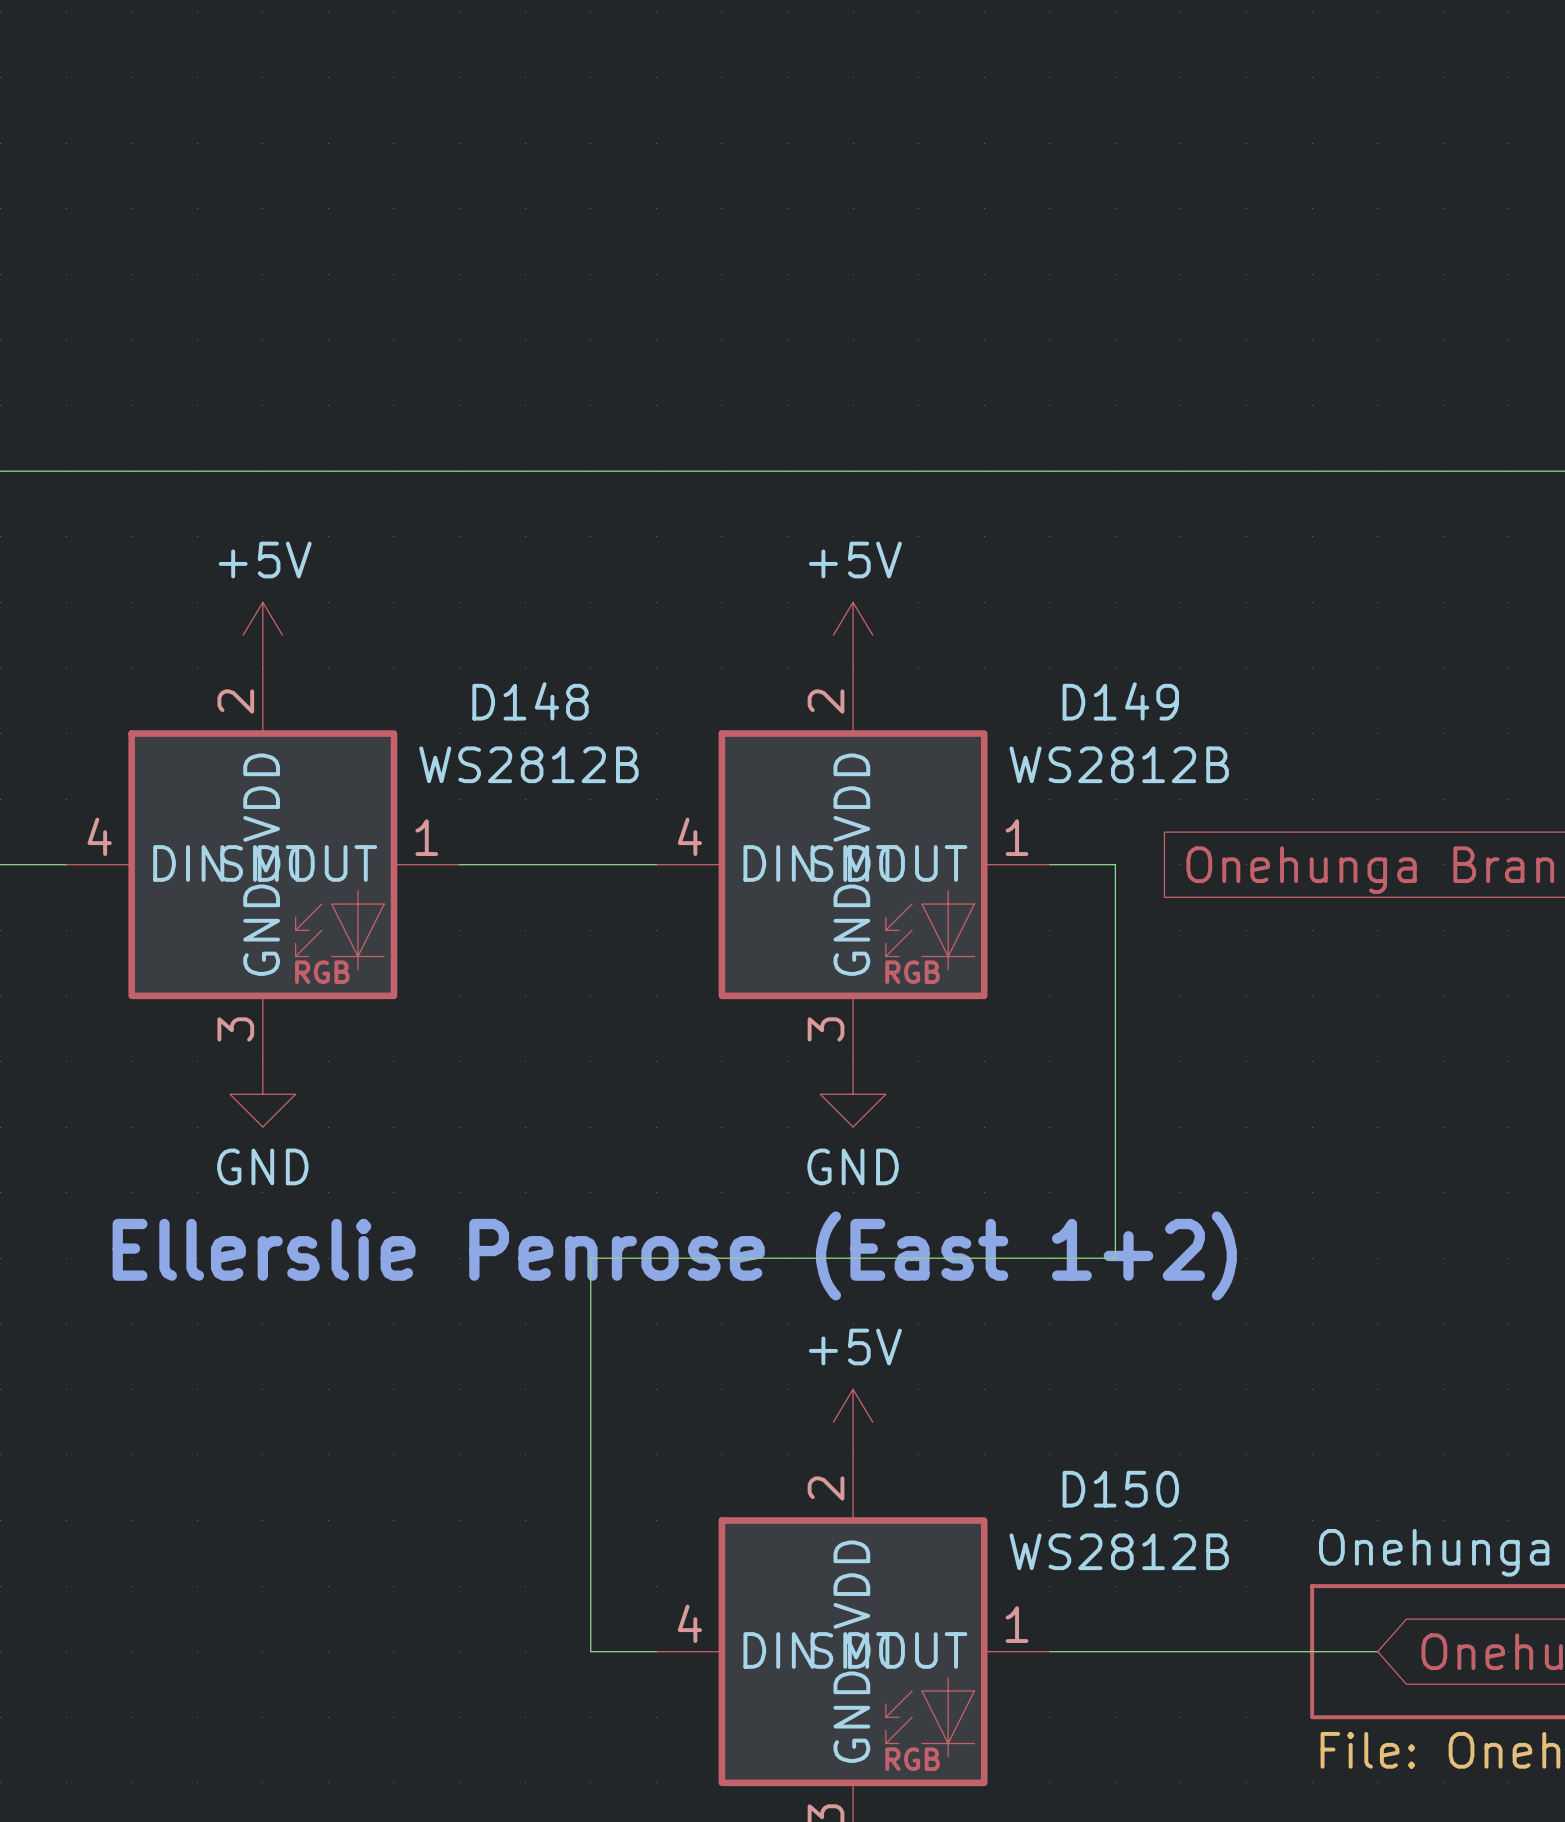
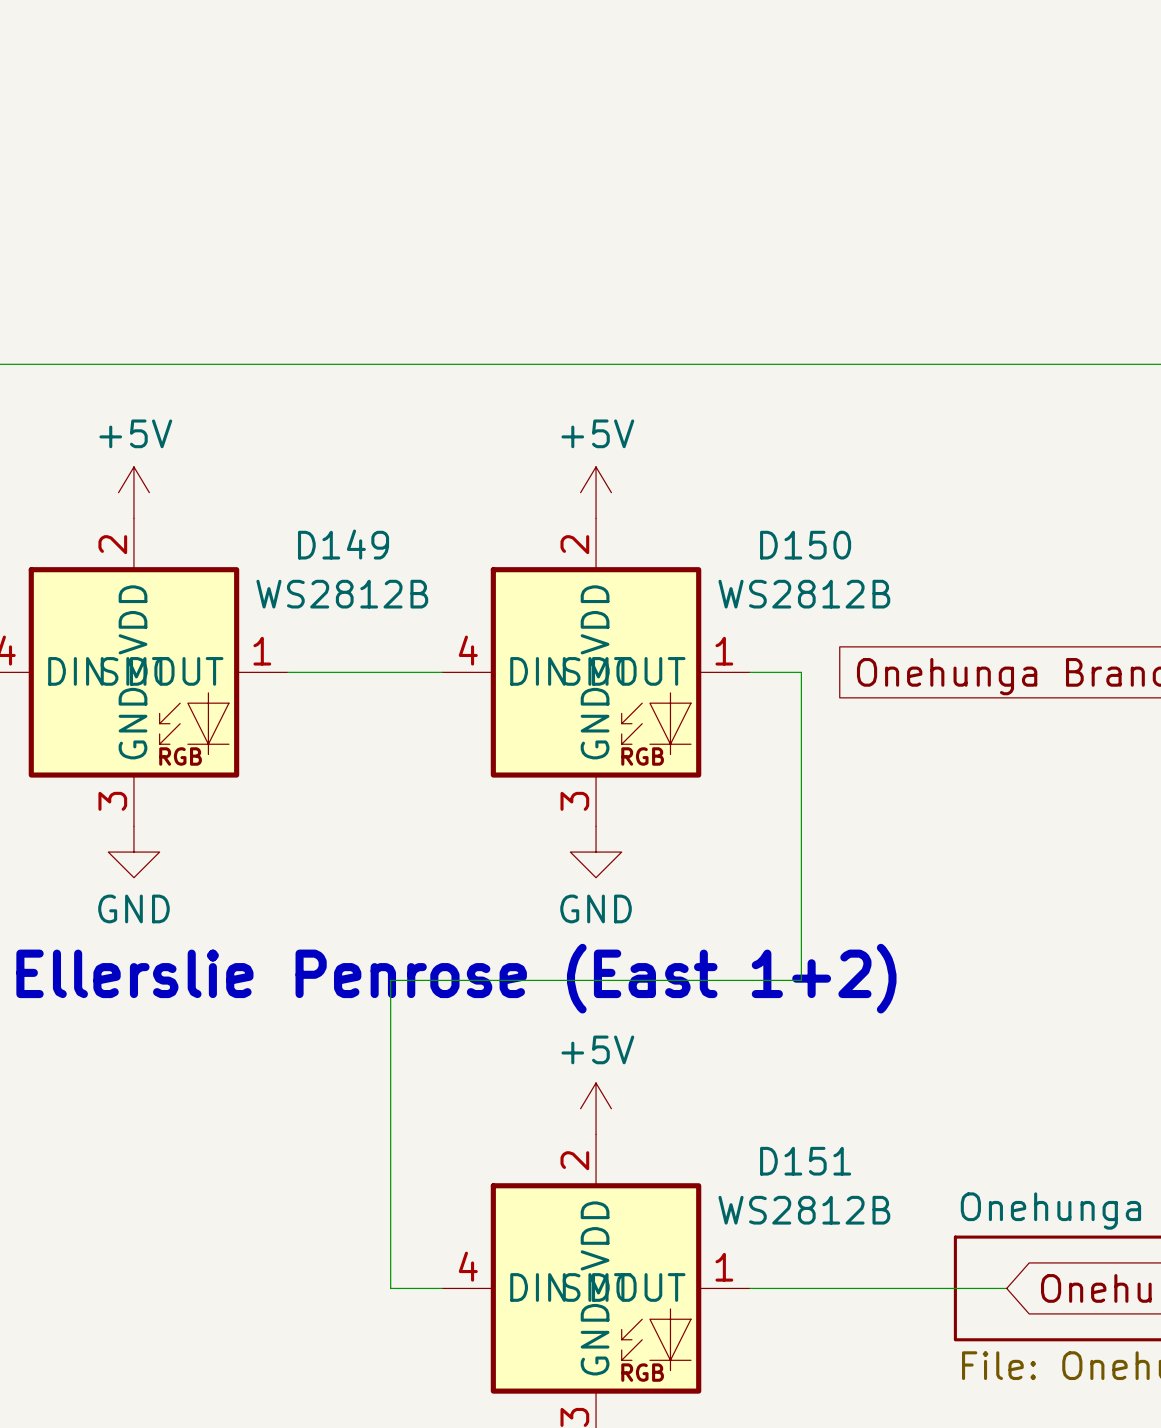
D148 name: D148 (530, 701) -> D149 (343, 544)
D149 name: D149 (1120, 701) -> D150 (805, 545)
D150 name: D150 (1120, 1489) -> D151 (805, 1161)

